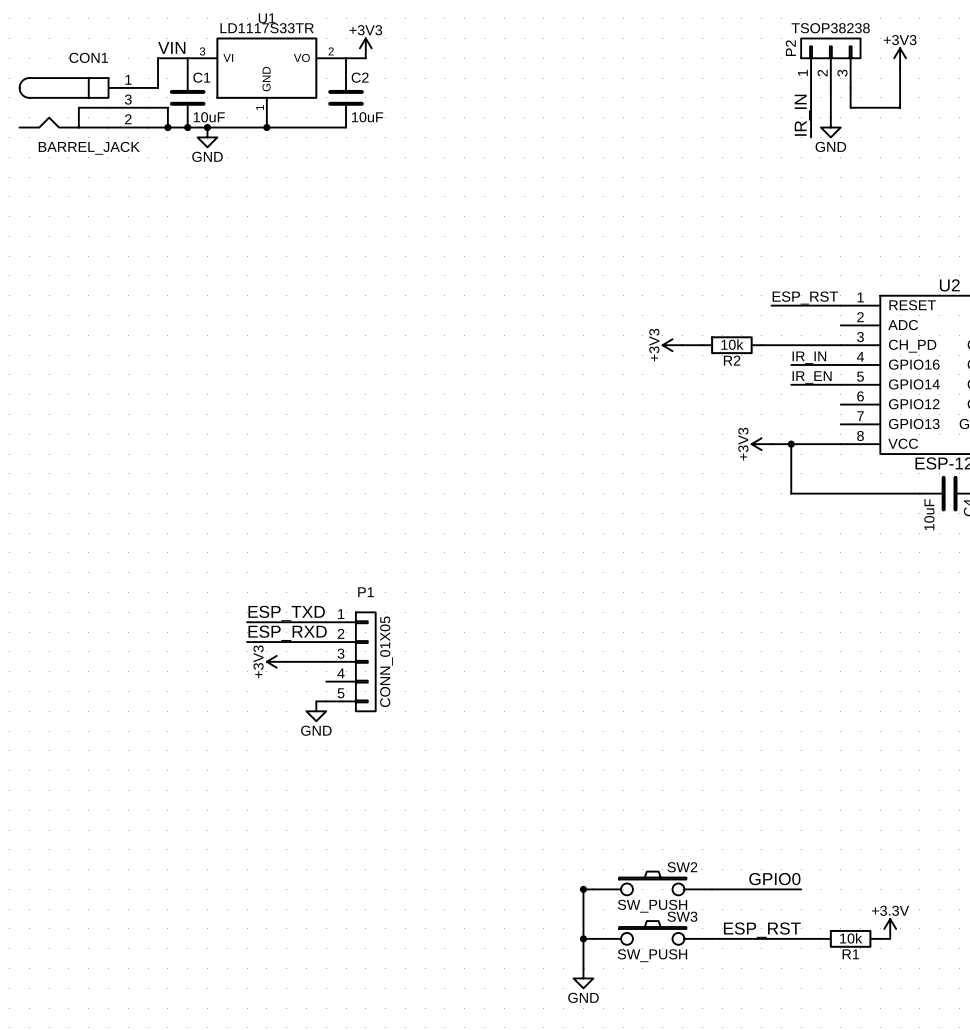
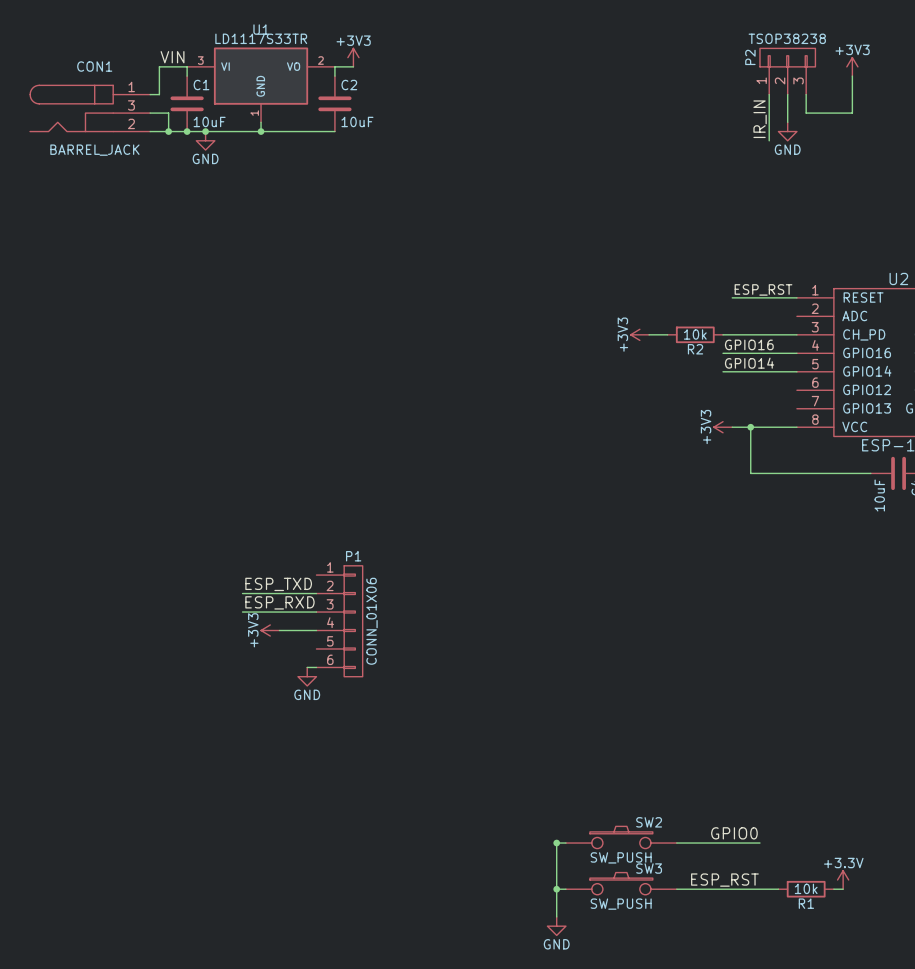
label: none -> GPIO16 (749, 344)
label: IR_IN (809, 357) -> none
wire: none -> (723, 353) (750, 353)
label: none -> GPIO14 (749, 363)
label: IR_EN (812, 377) -> none
wire: none -> (723, 371) (750, 371)
P1 symbol: [326, 612, 376, 712] -> [316, 565, 363, 677]
P1 value: CONN_01X05 (386, 661) -> CONN_01X06 (372, 621)

